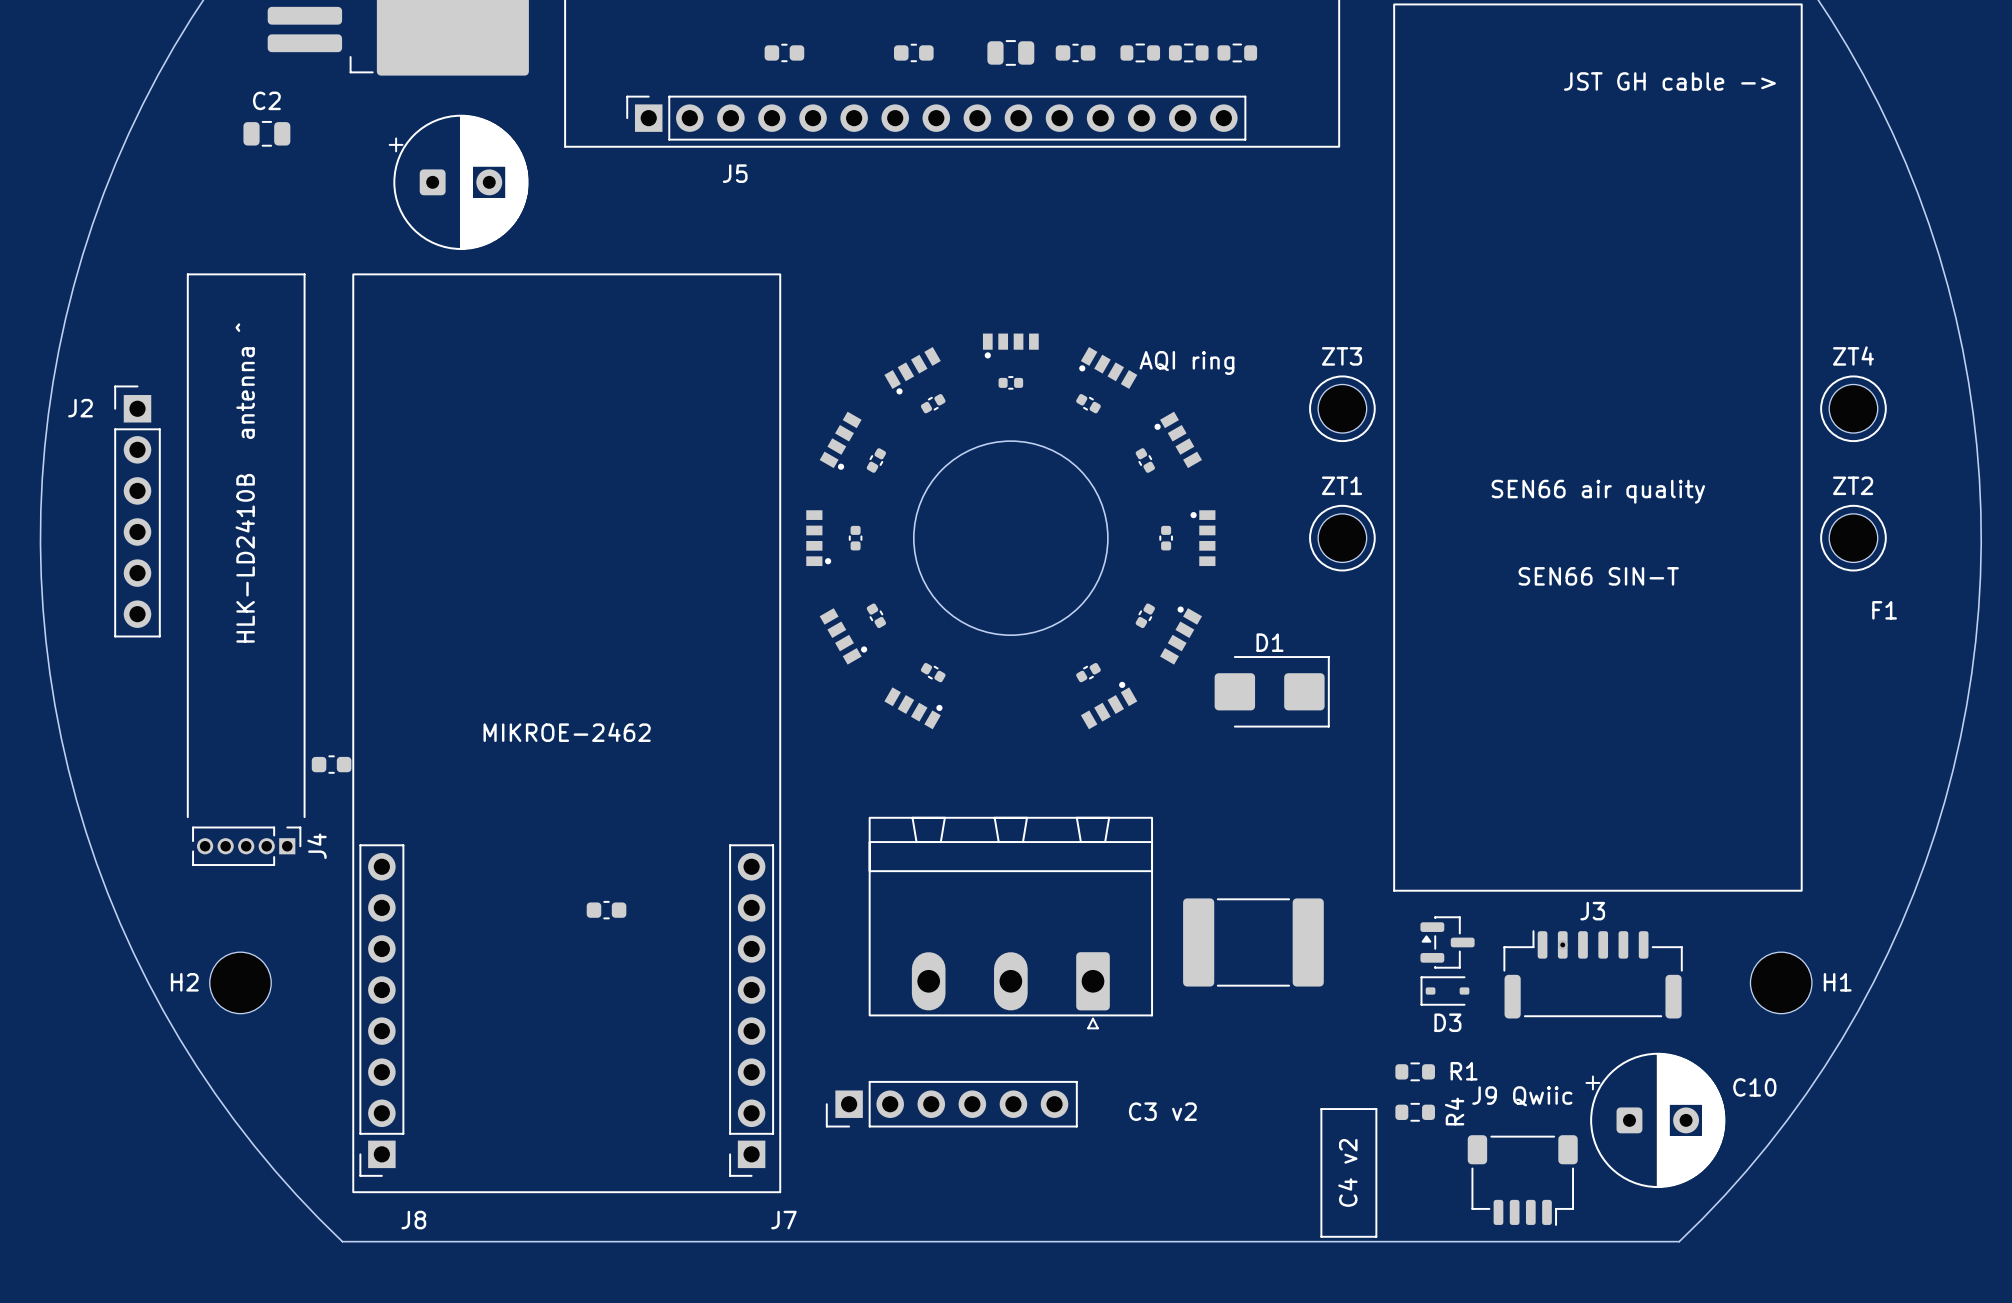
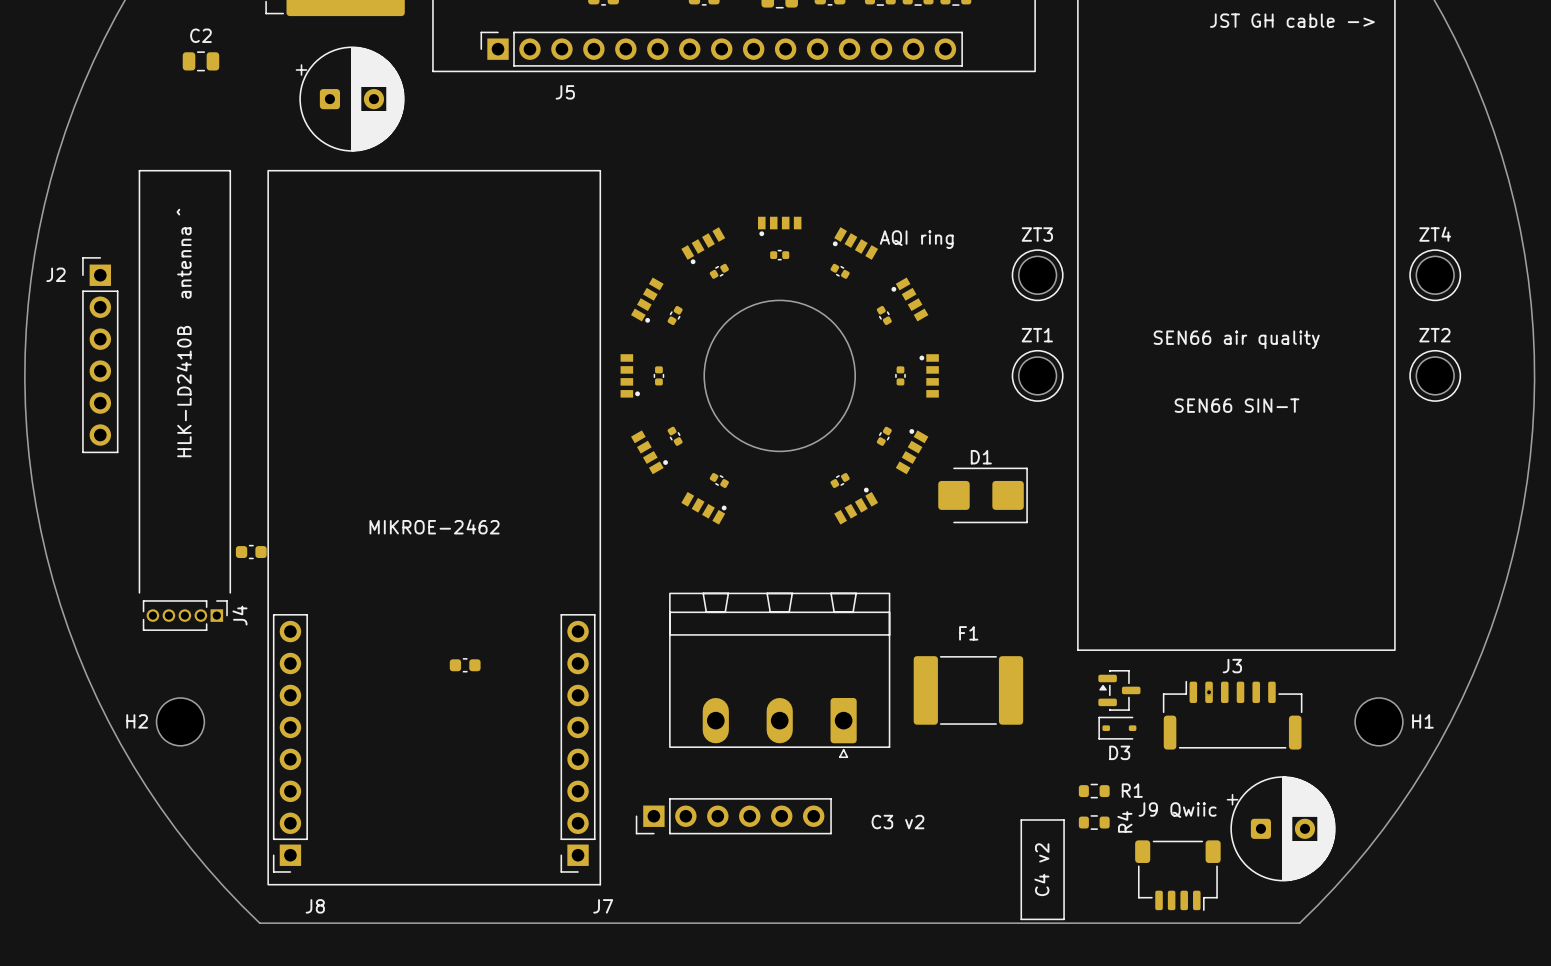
text: F1 (1884, 610) -> none
text: none -> F1 (968, 633)
text: C10 (1754, 1087) -> none

